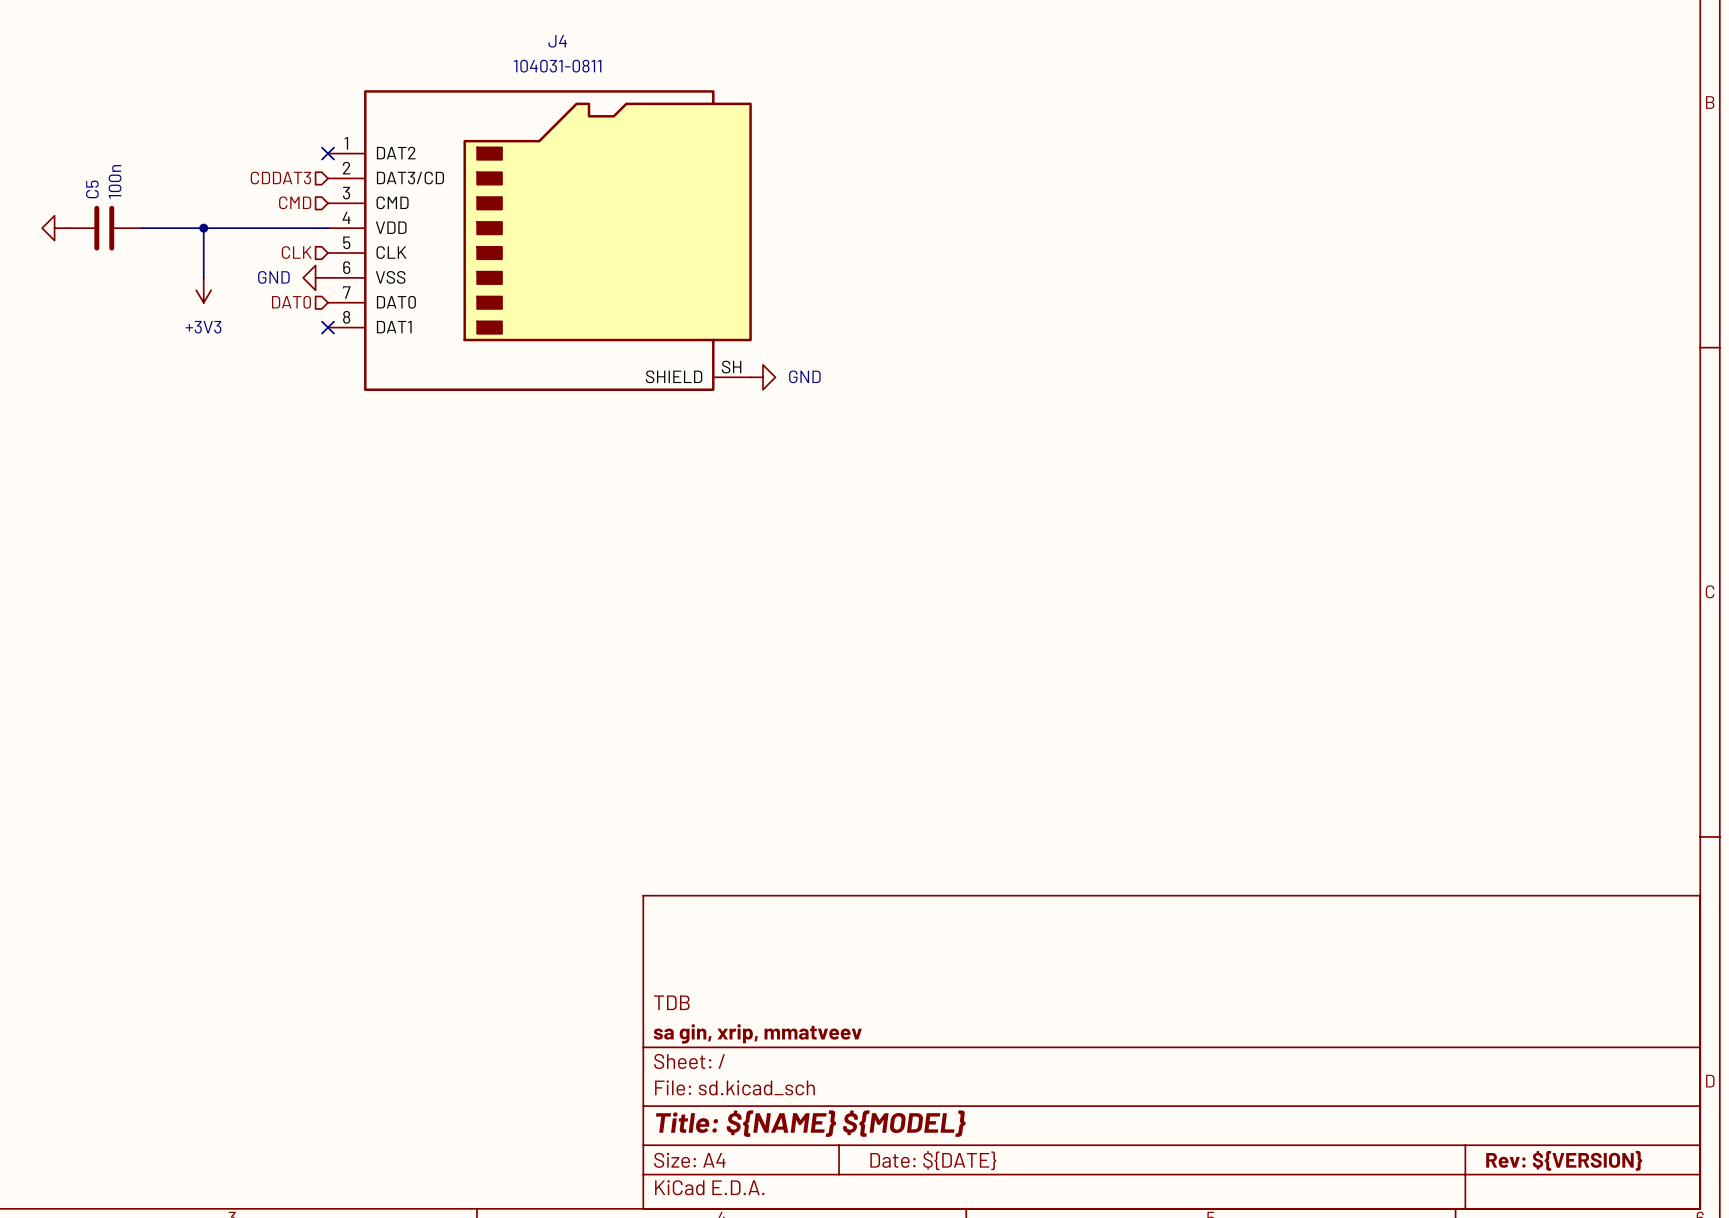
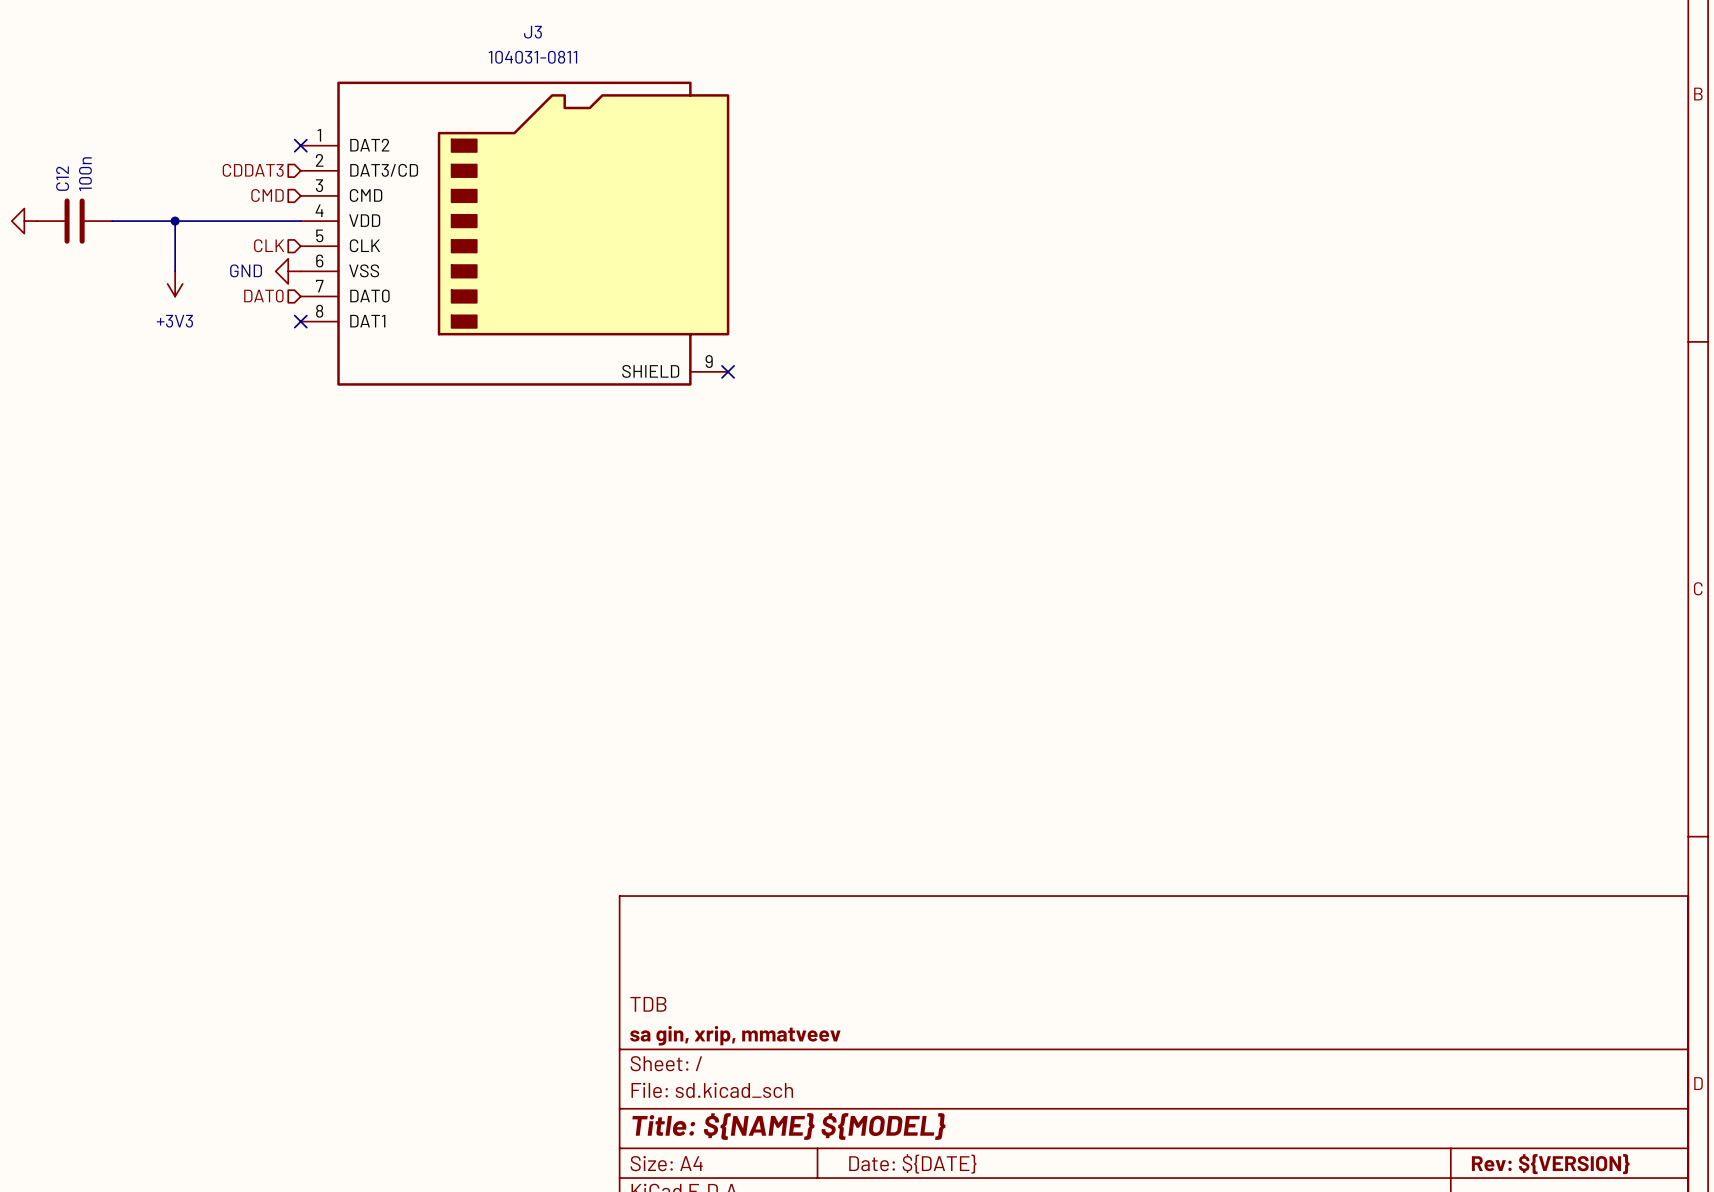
J4 name: J4 (557, 41) -> J3 (532, 32)
C5 name: C5 (92, 189) -> C12 (62, 178)
J4 pin number: SH (731, 367) -> 9 (709, 361)
no-connect mark: none -> (728, 371)
power symbol: GND (763, 377) -> none

